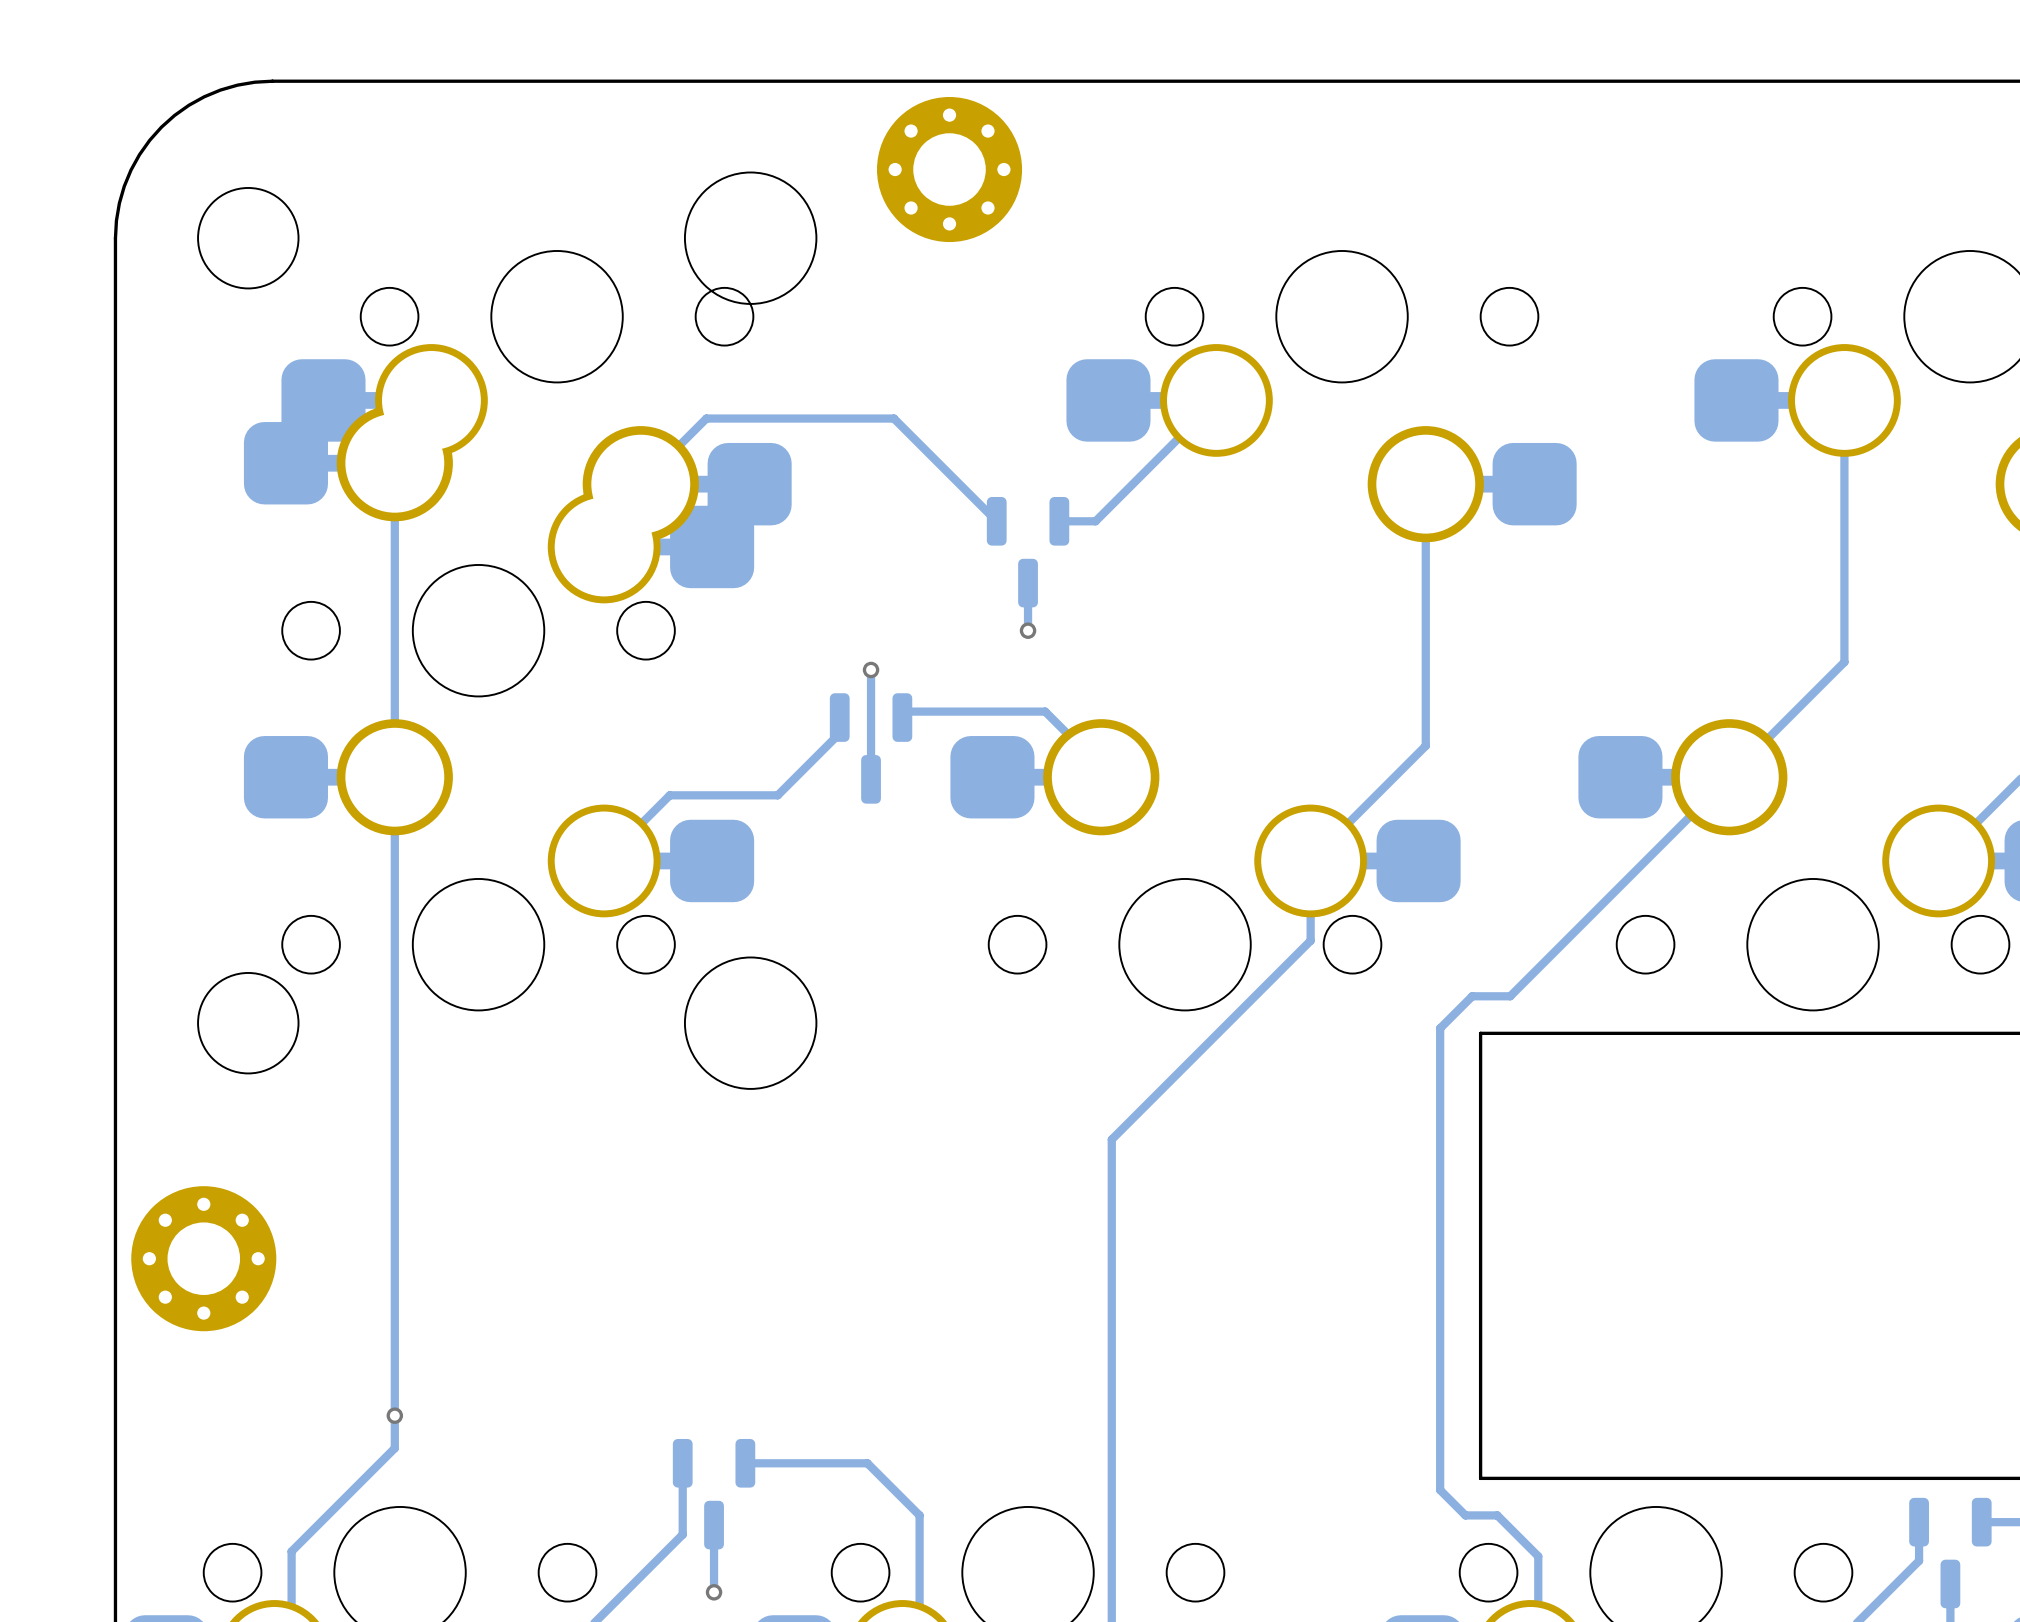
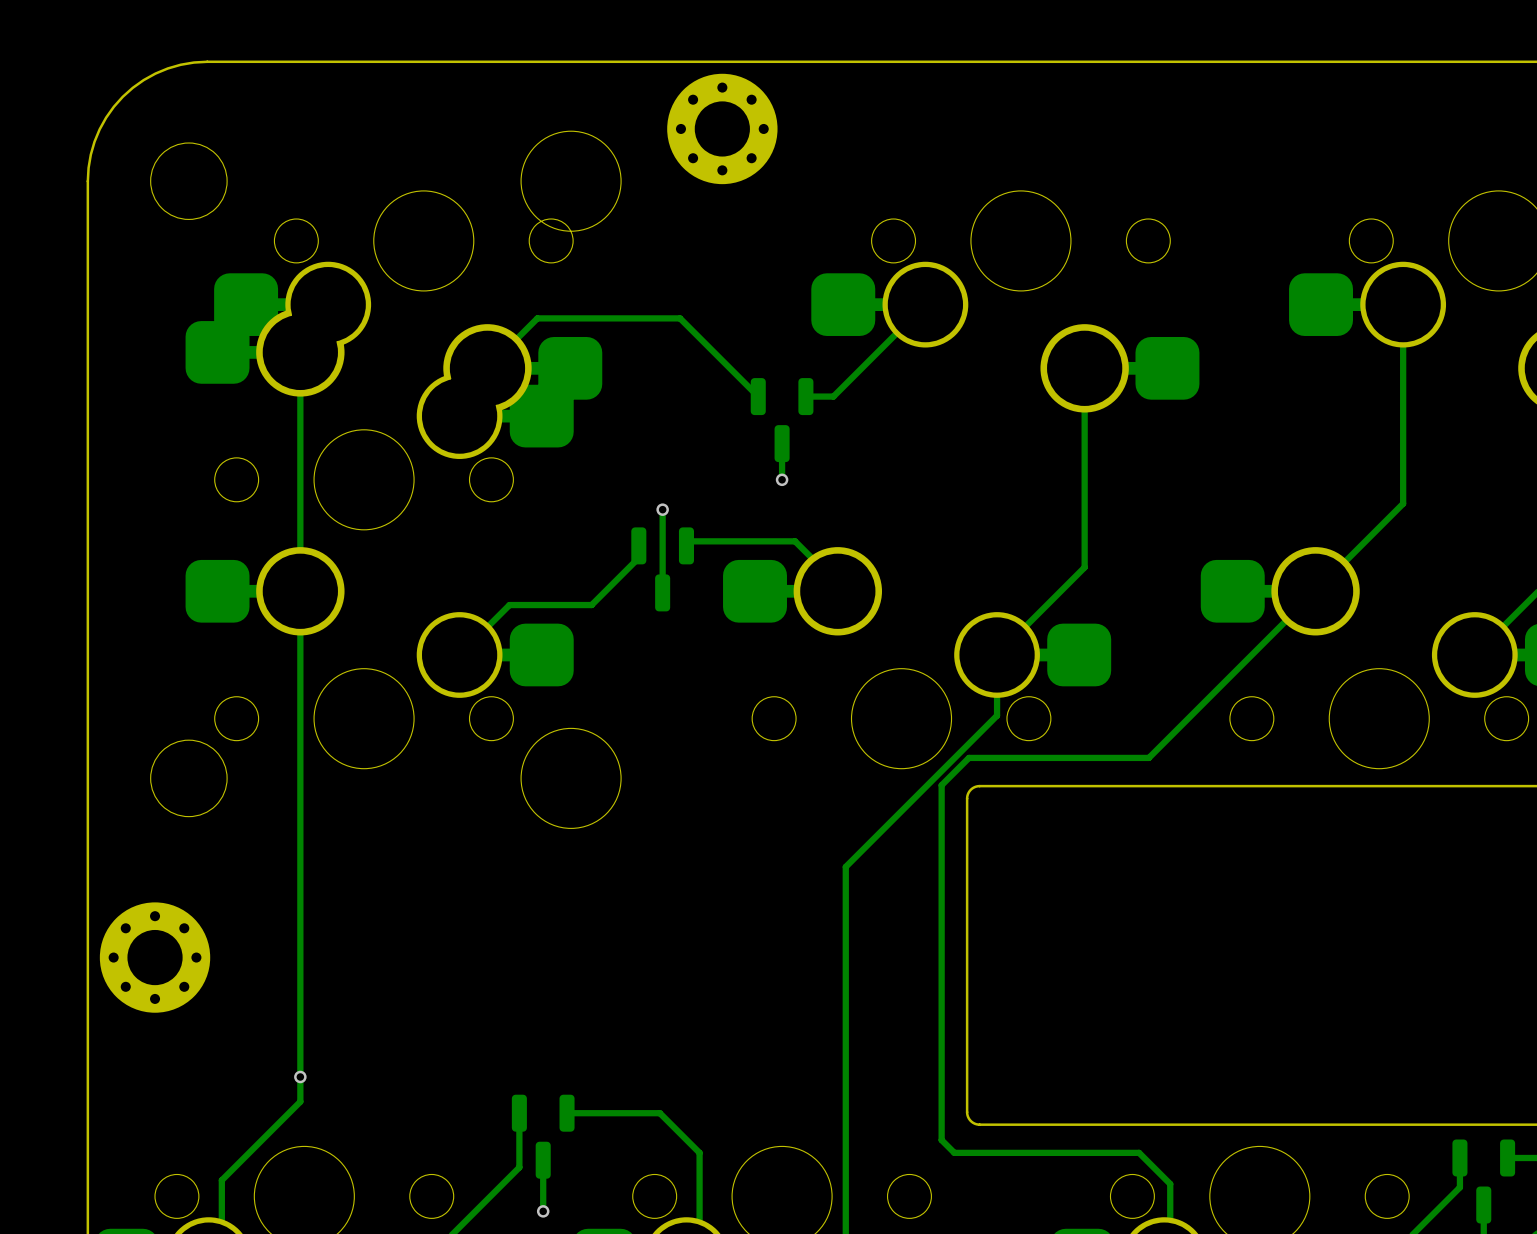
track: (1472, 996) (1440, 1028) (1440, 1490) (1465, 1515) -> (1119, 757) (968, 757) (941, 785) (941, 1140) (954, 1152) (1114, 1152)
board edge: (1480, 1033) (1480, 1478) -> (1126, 786) (978, 786) (969, 791) (967, 798) (968, 1116) (973, 1122) (979, 1124) (1126, 1124)

